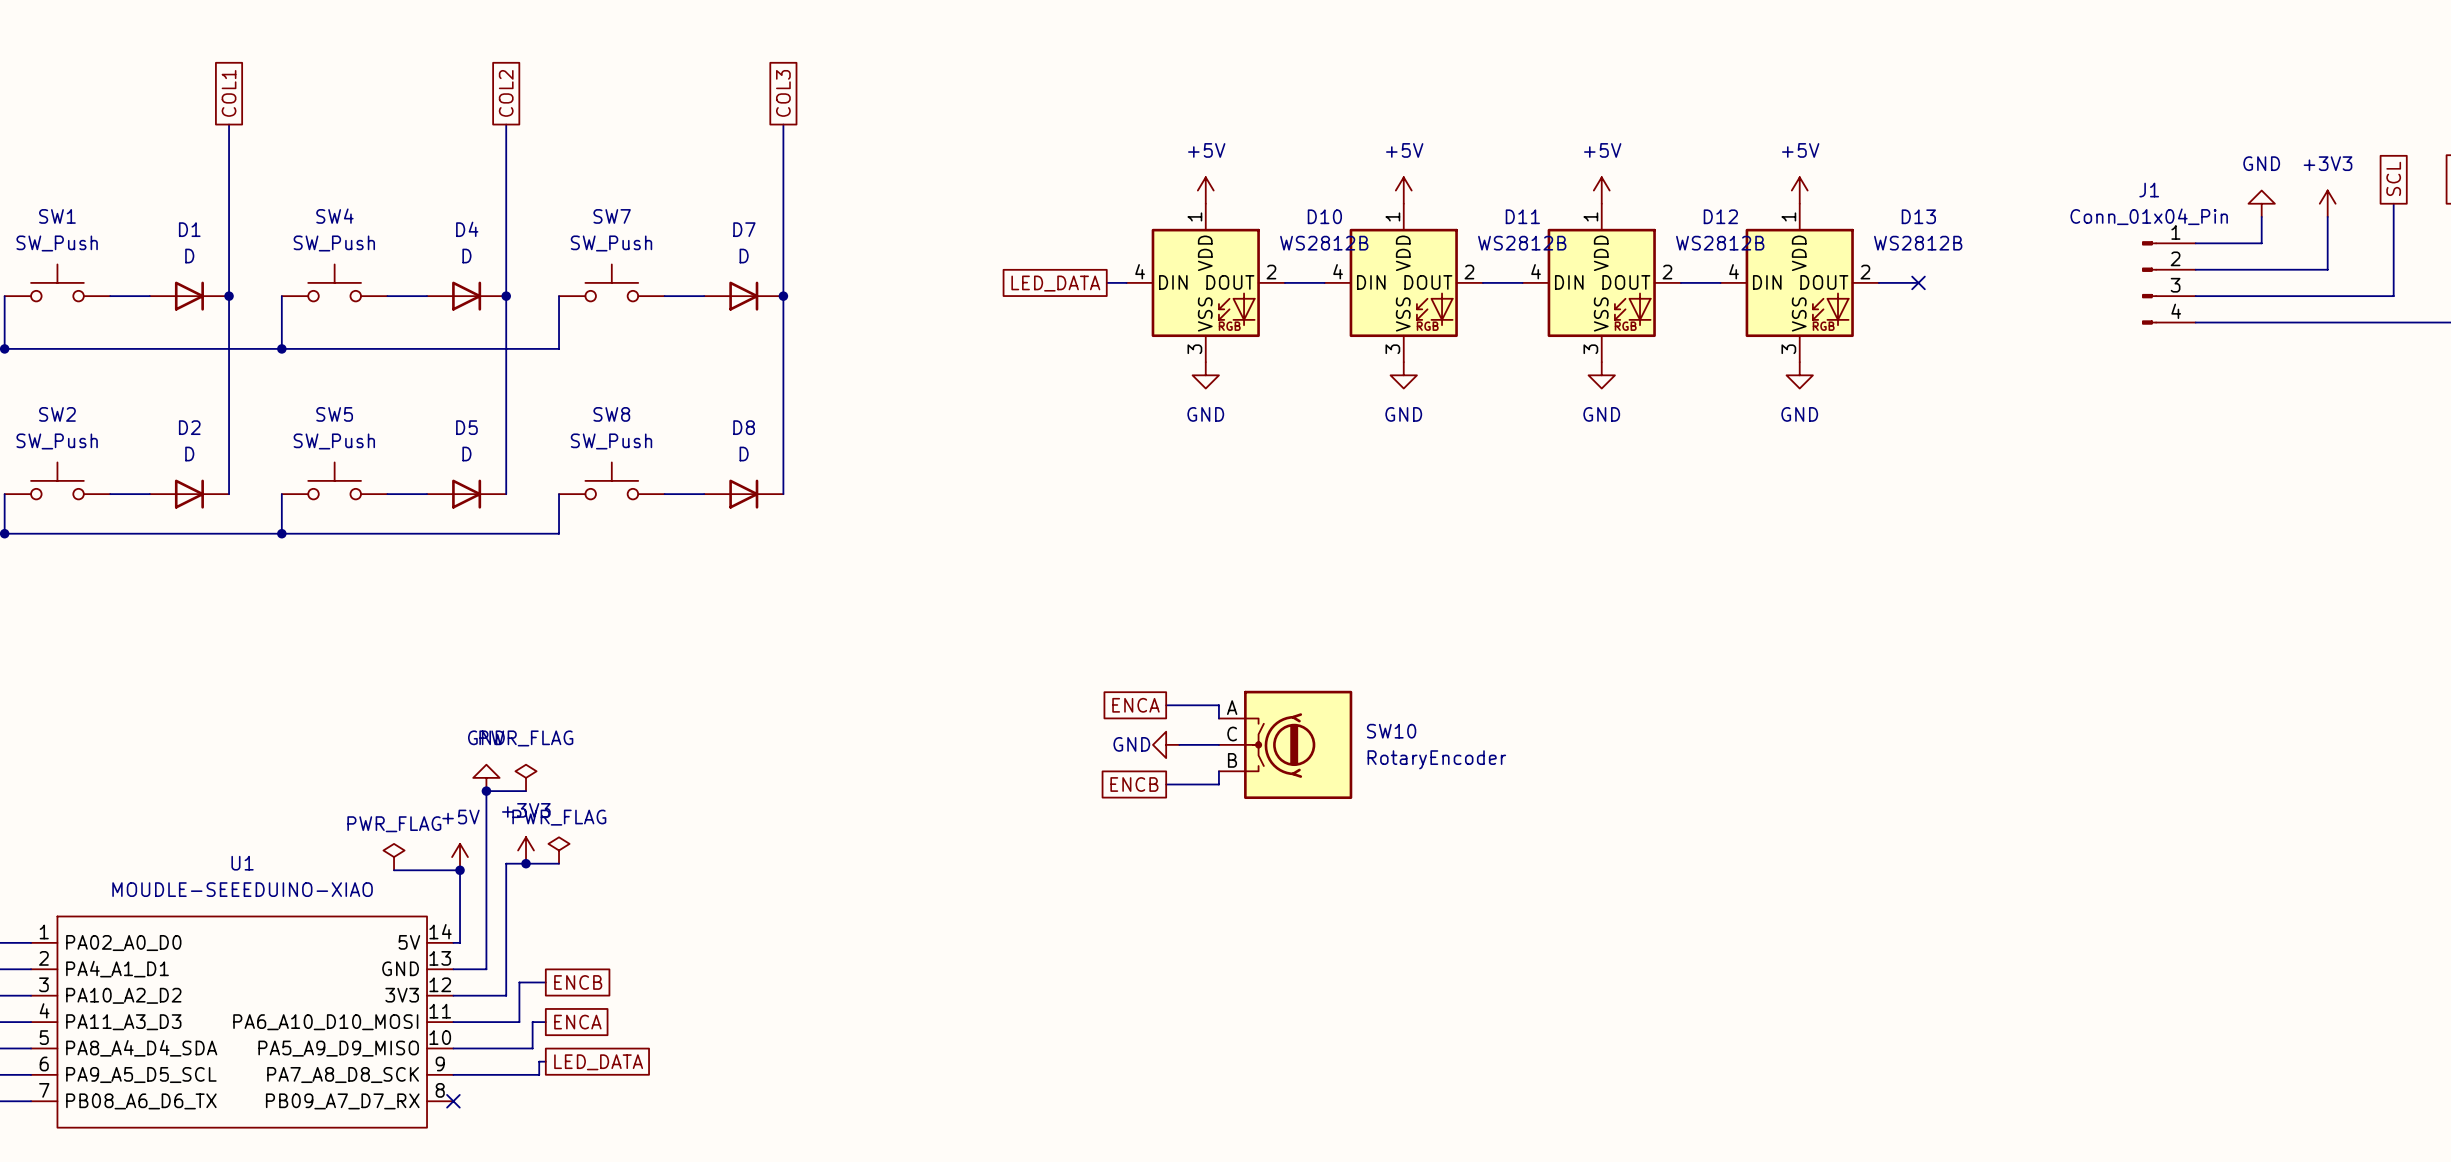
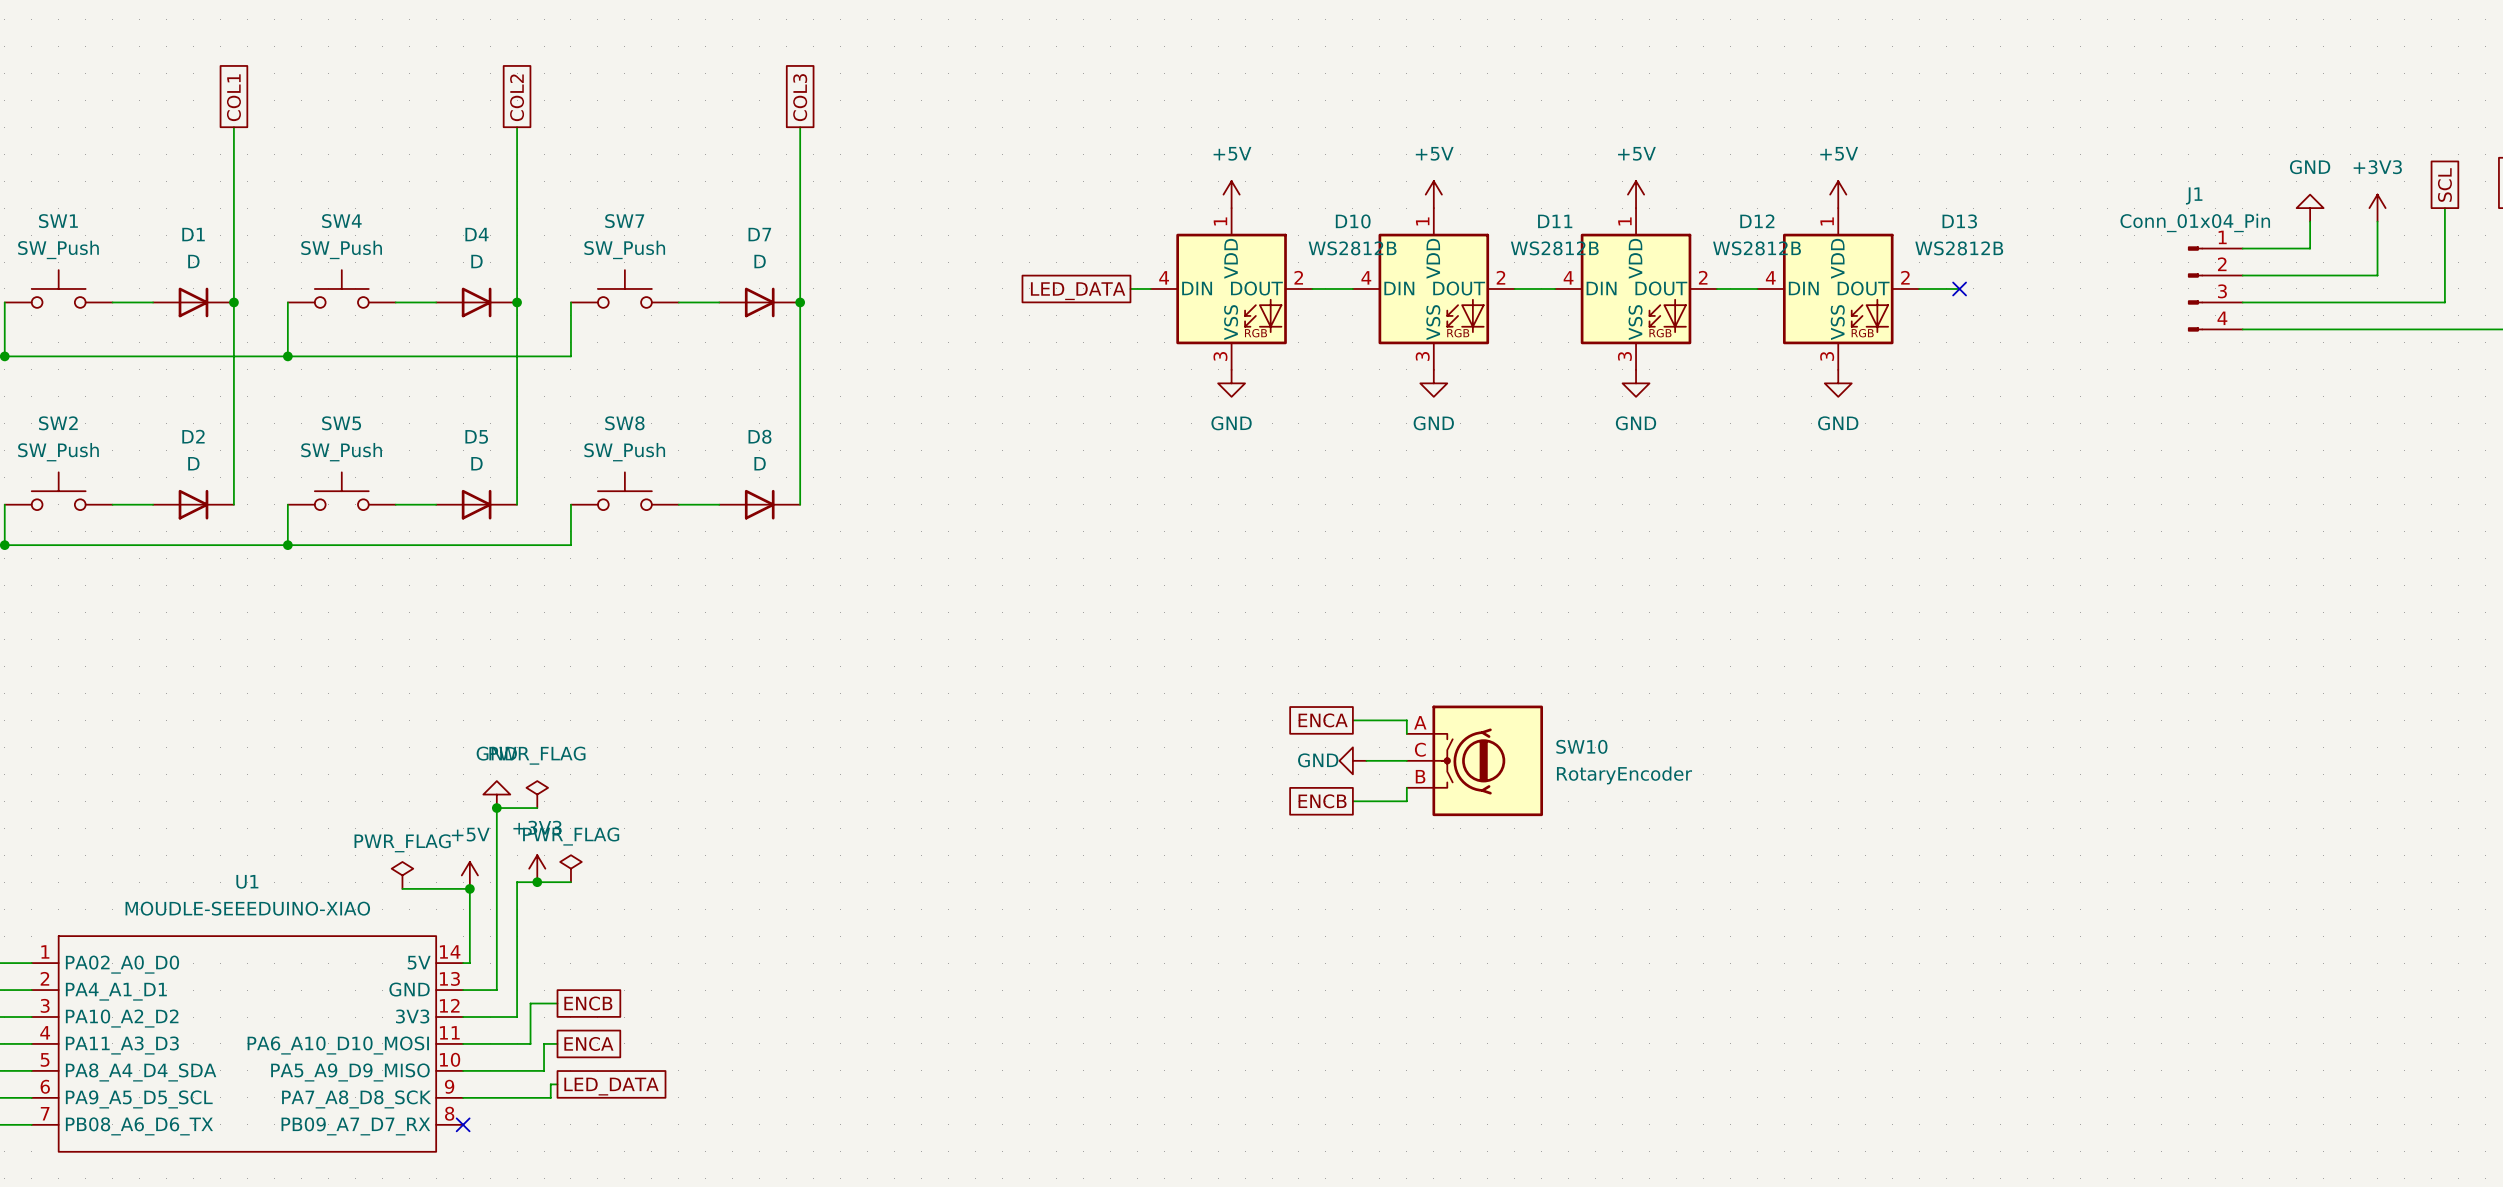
global label position: ENCA (1135, 705) -> ENCA (1323, 720)
wire: (1166, 705) (1218, 705) (1218, 718) -> (1352, 720) (1406, 720) (1406, 733)
power symbol position: GND (1166, 744) -> GND (1352, 760)
wire: (1179, 744) (1218, 744) -> (1366, 760) (1406, 760)
SW10 position: (1285, 744) -> (1474, 760)
wire: (1218, 771) (1218, 784) (1166, 784) -> (1406, 787) (1406, 801) (1352, 801)
global label position: ENCB (1134, 784) -> ENCB (1322, 801)

